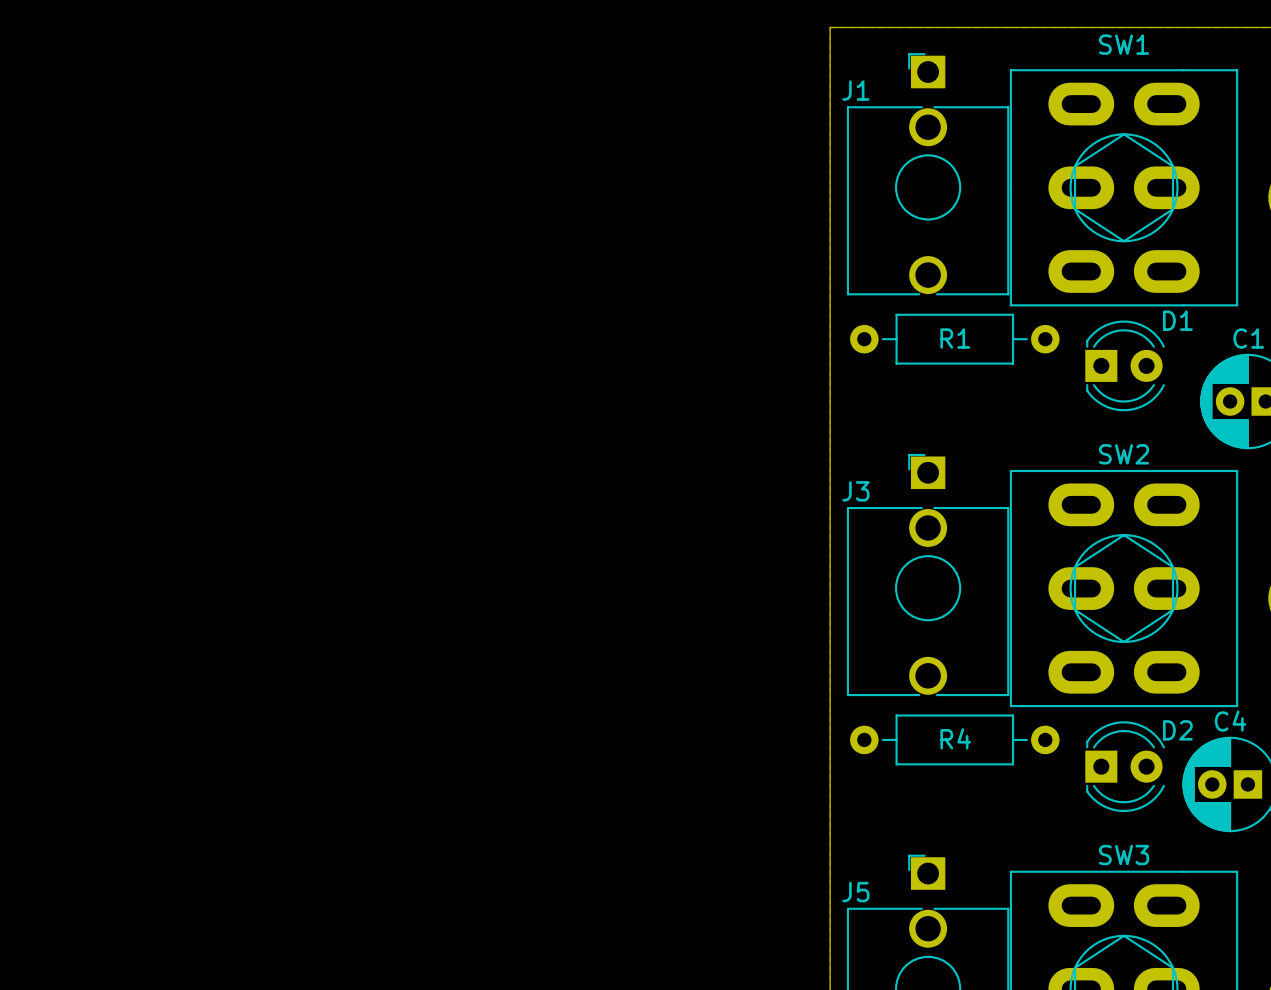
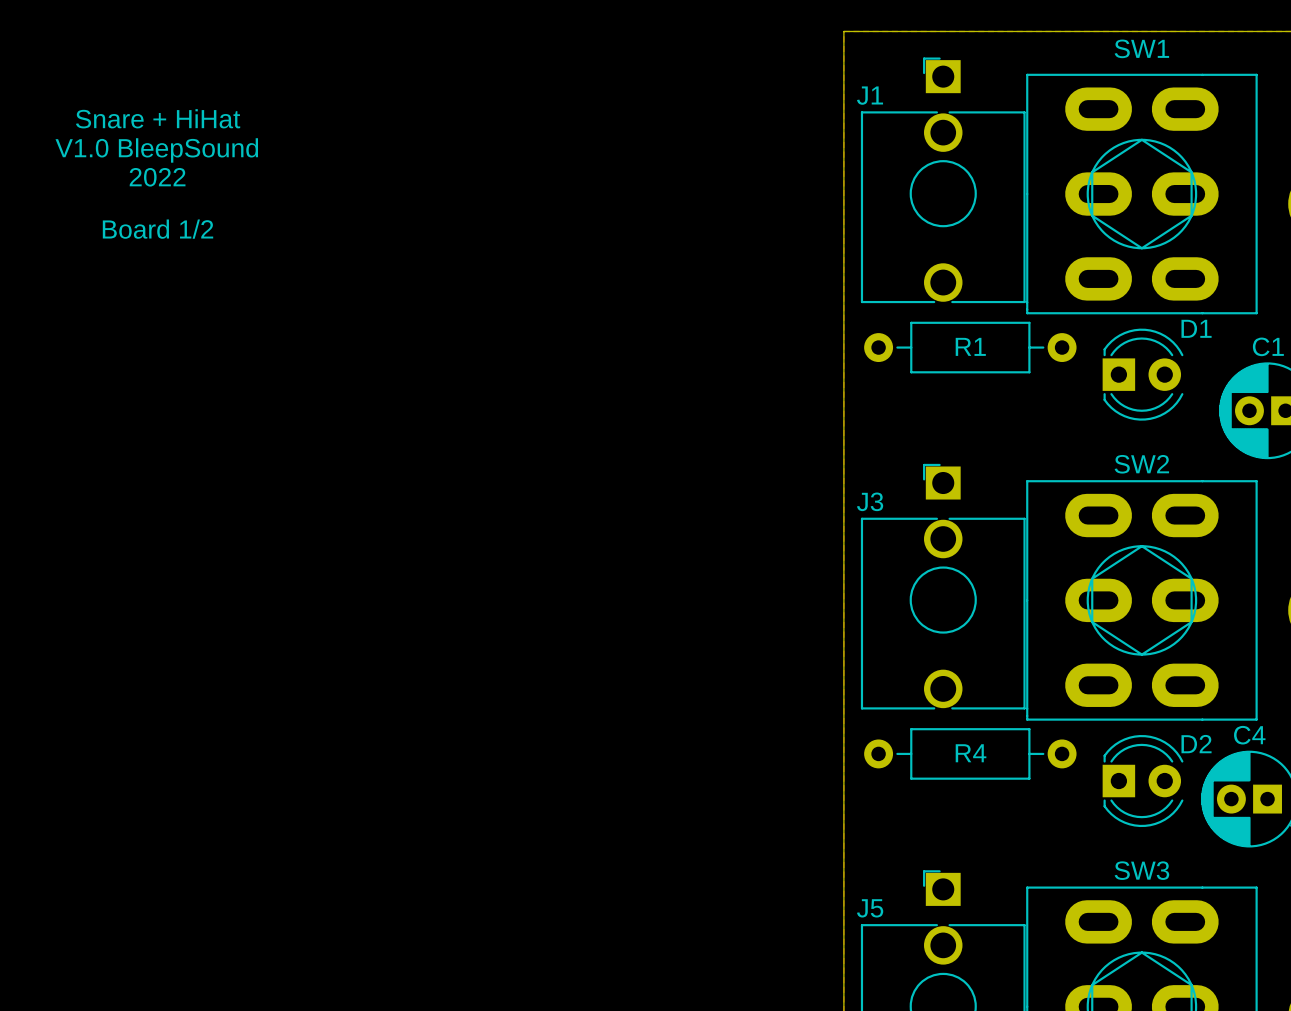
text: none -> Snare + HiHat (158, 118)
text: none -> V1.0 BleepSound (156, 150)
text: none -> 2022 (157, 177)
text: none -> Board 1/2 (158, 229)

